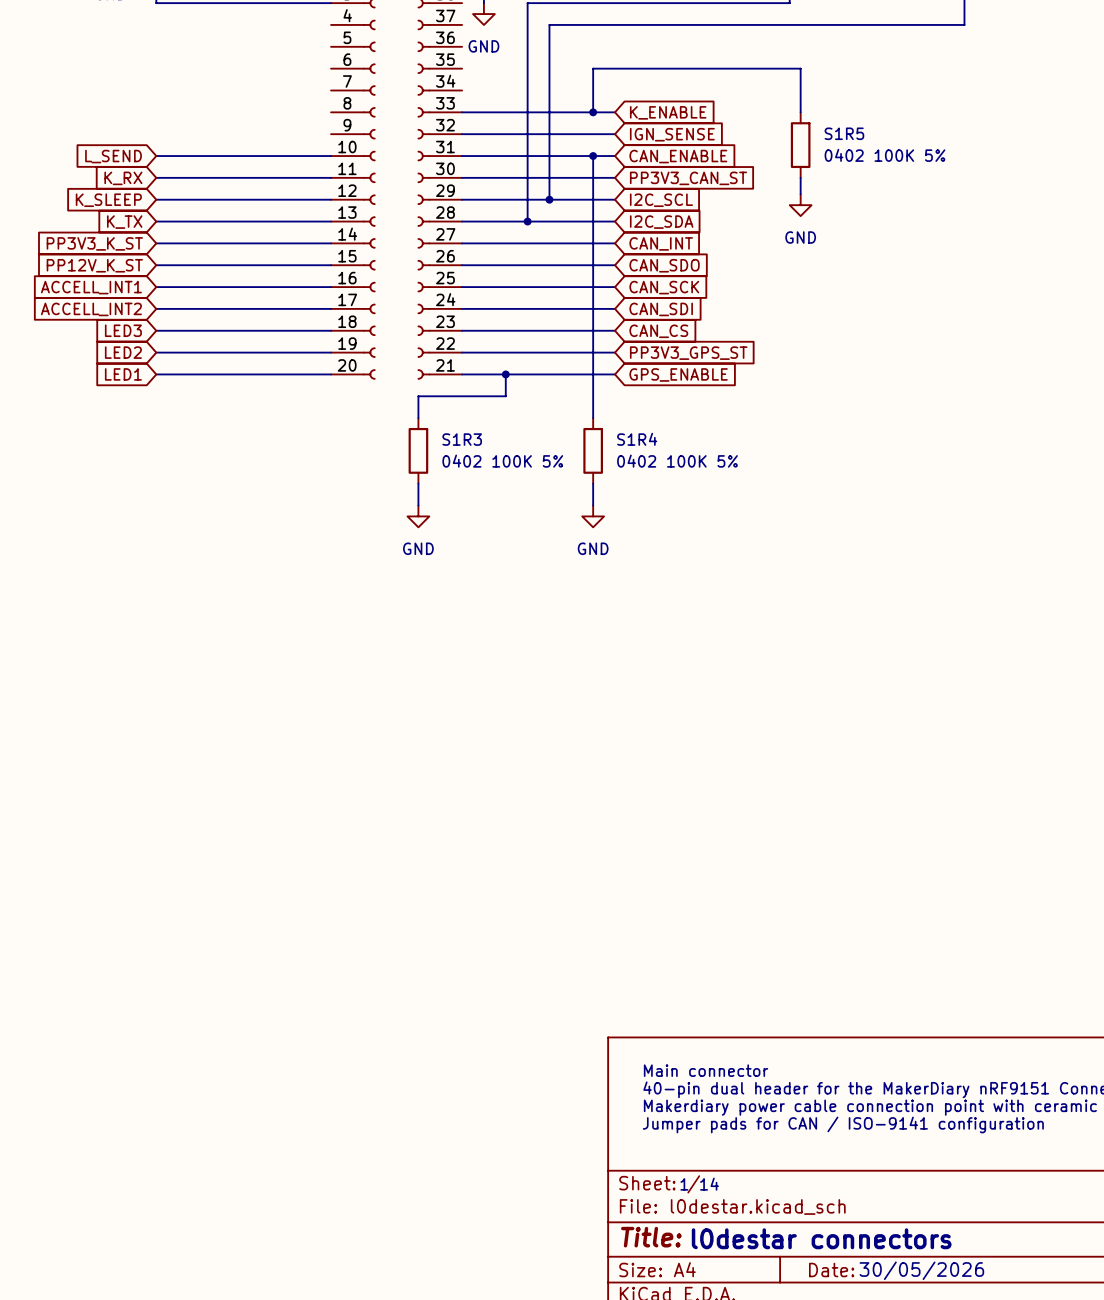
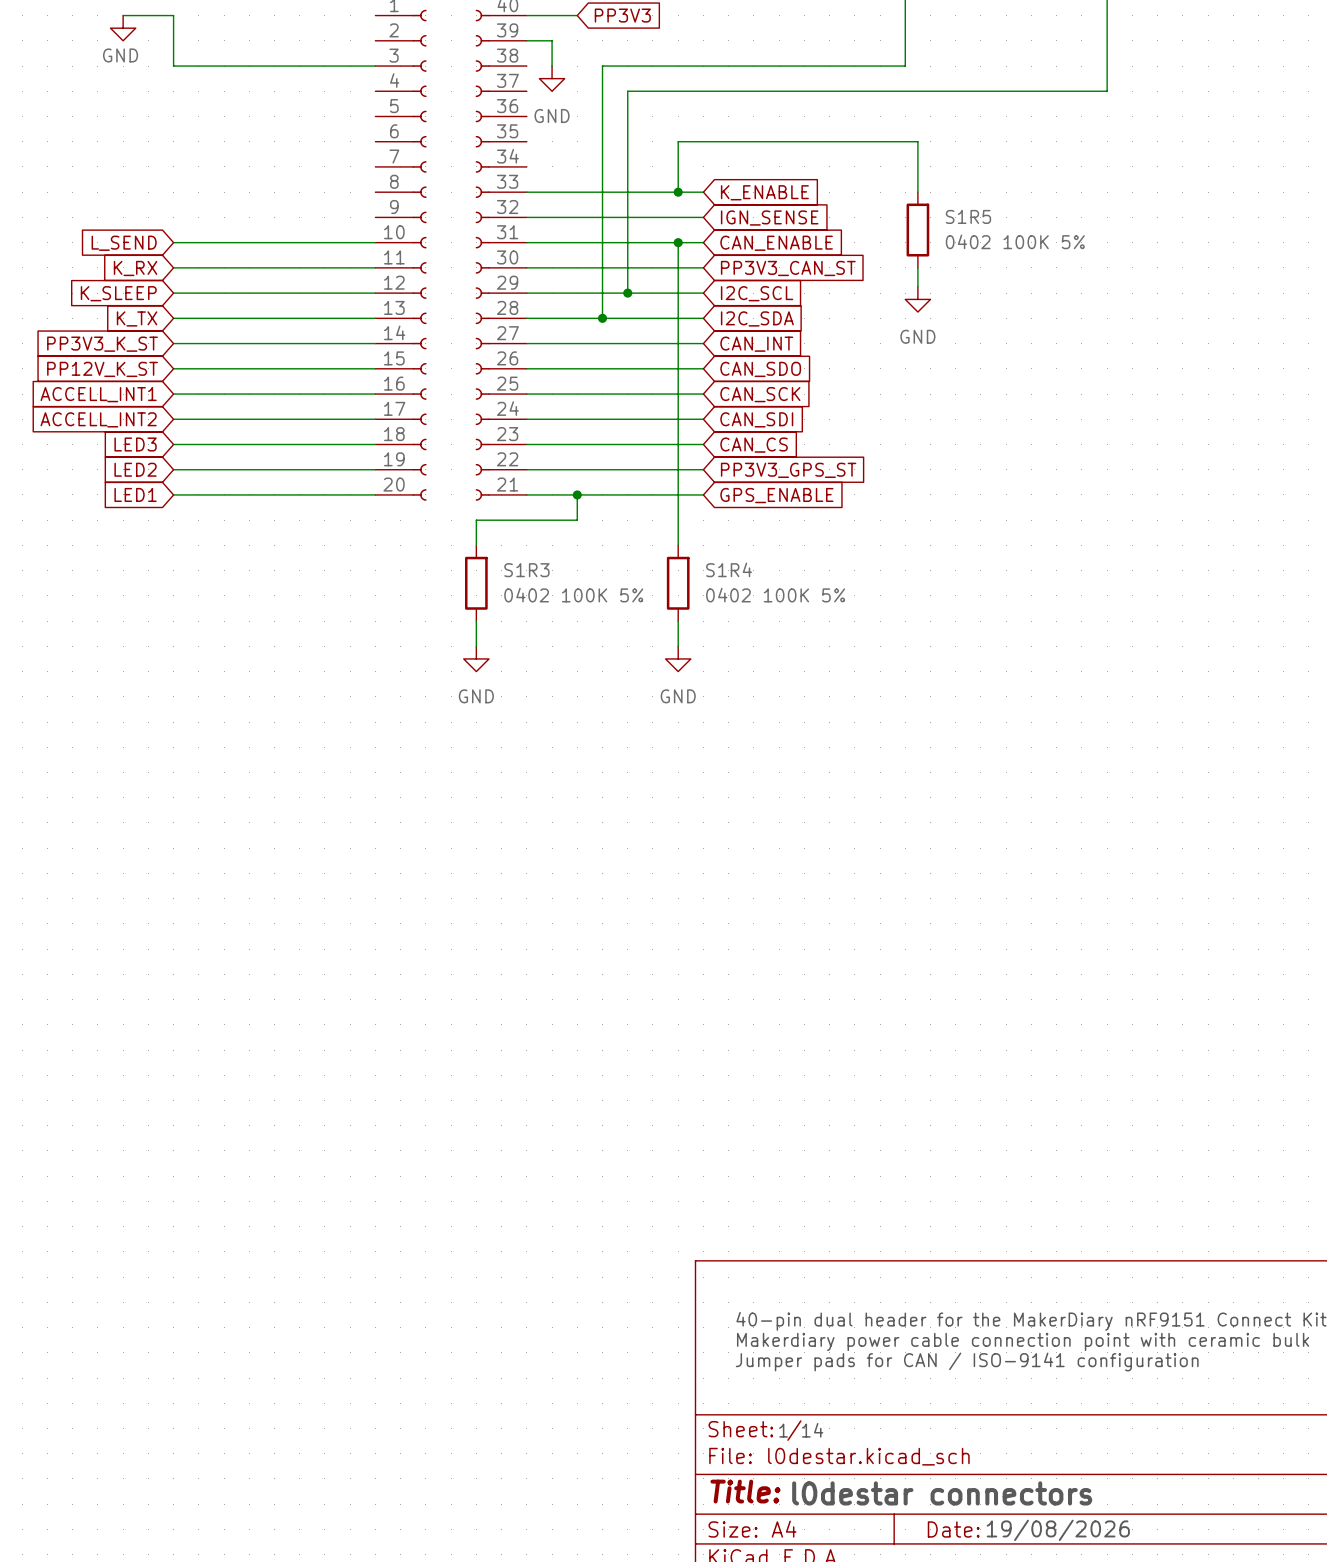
text: Main connector (706, 1070) -> none
text: 30/05/2026 (921, 1270) -> 19/08/2026 (1058, 1530)

